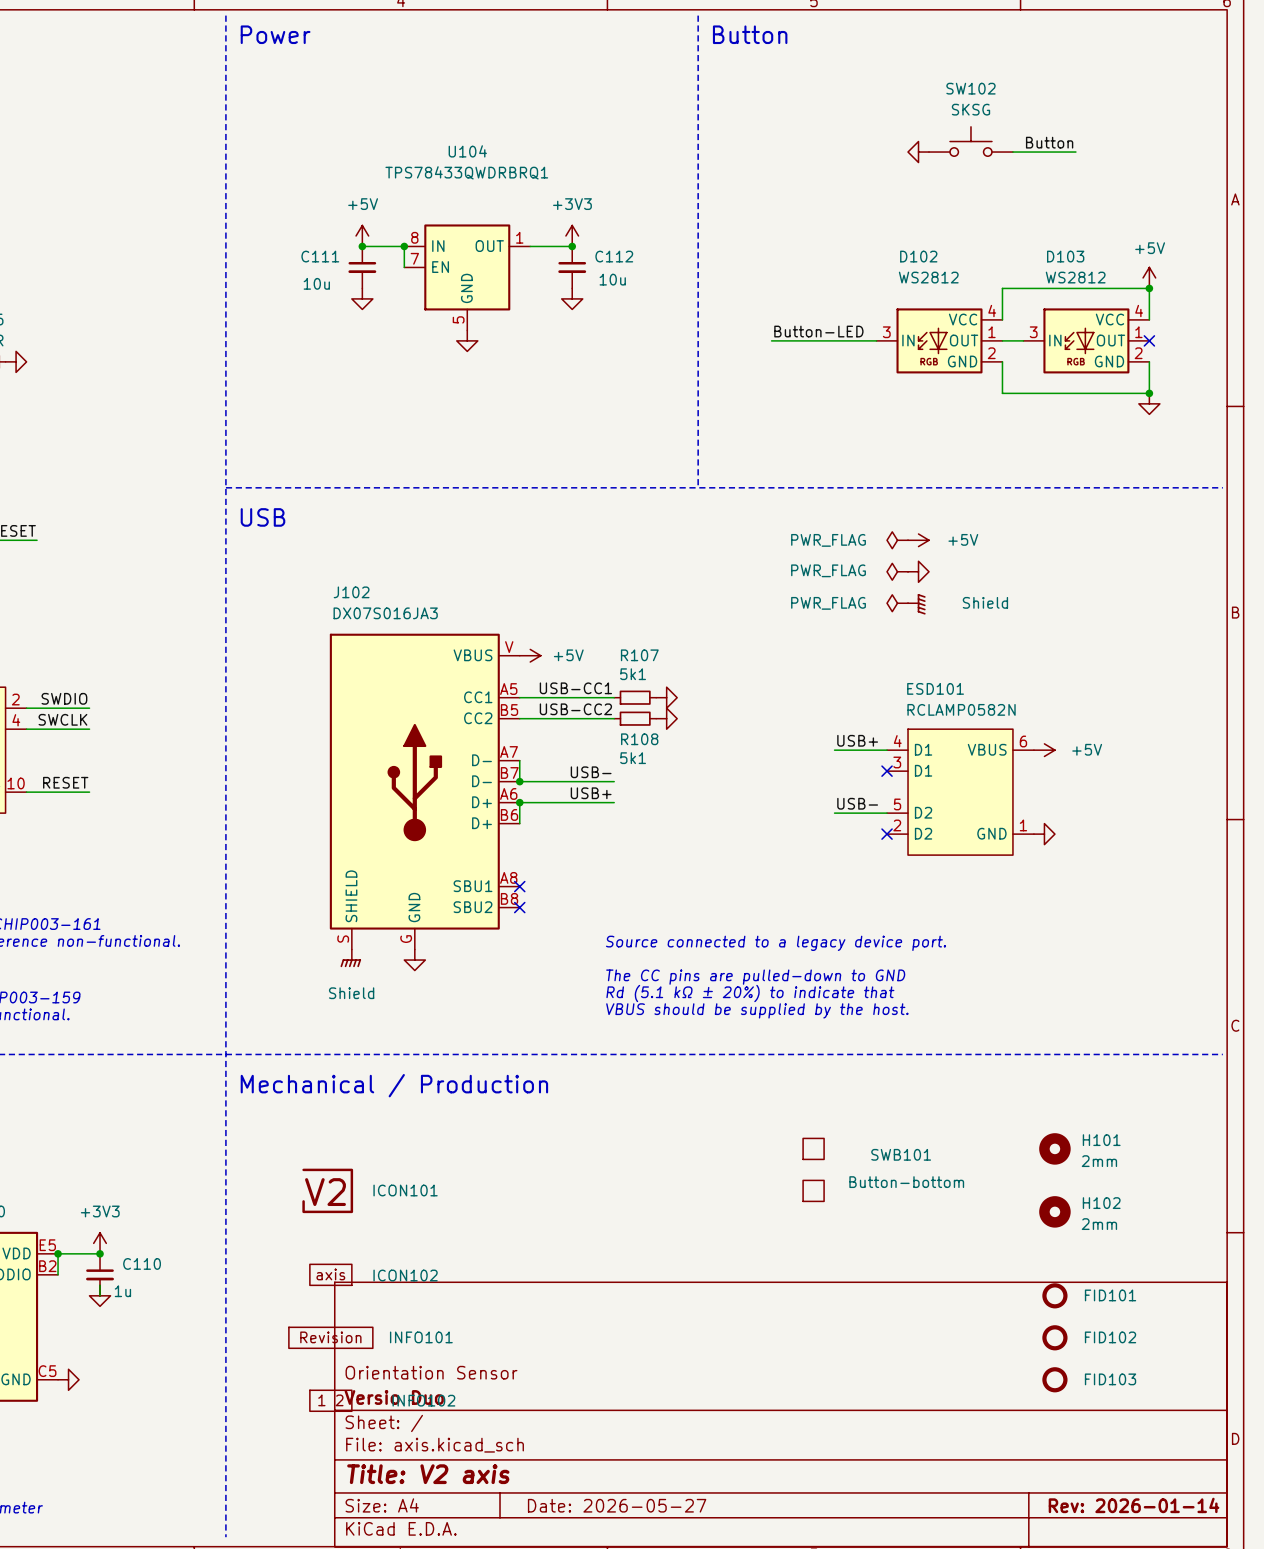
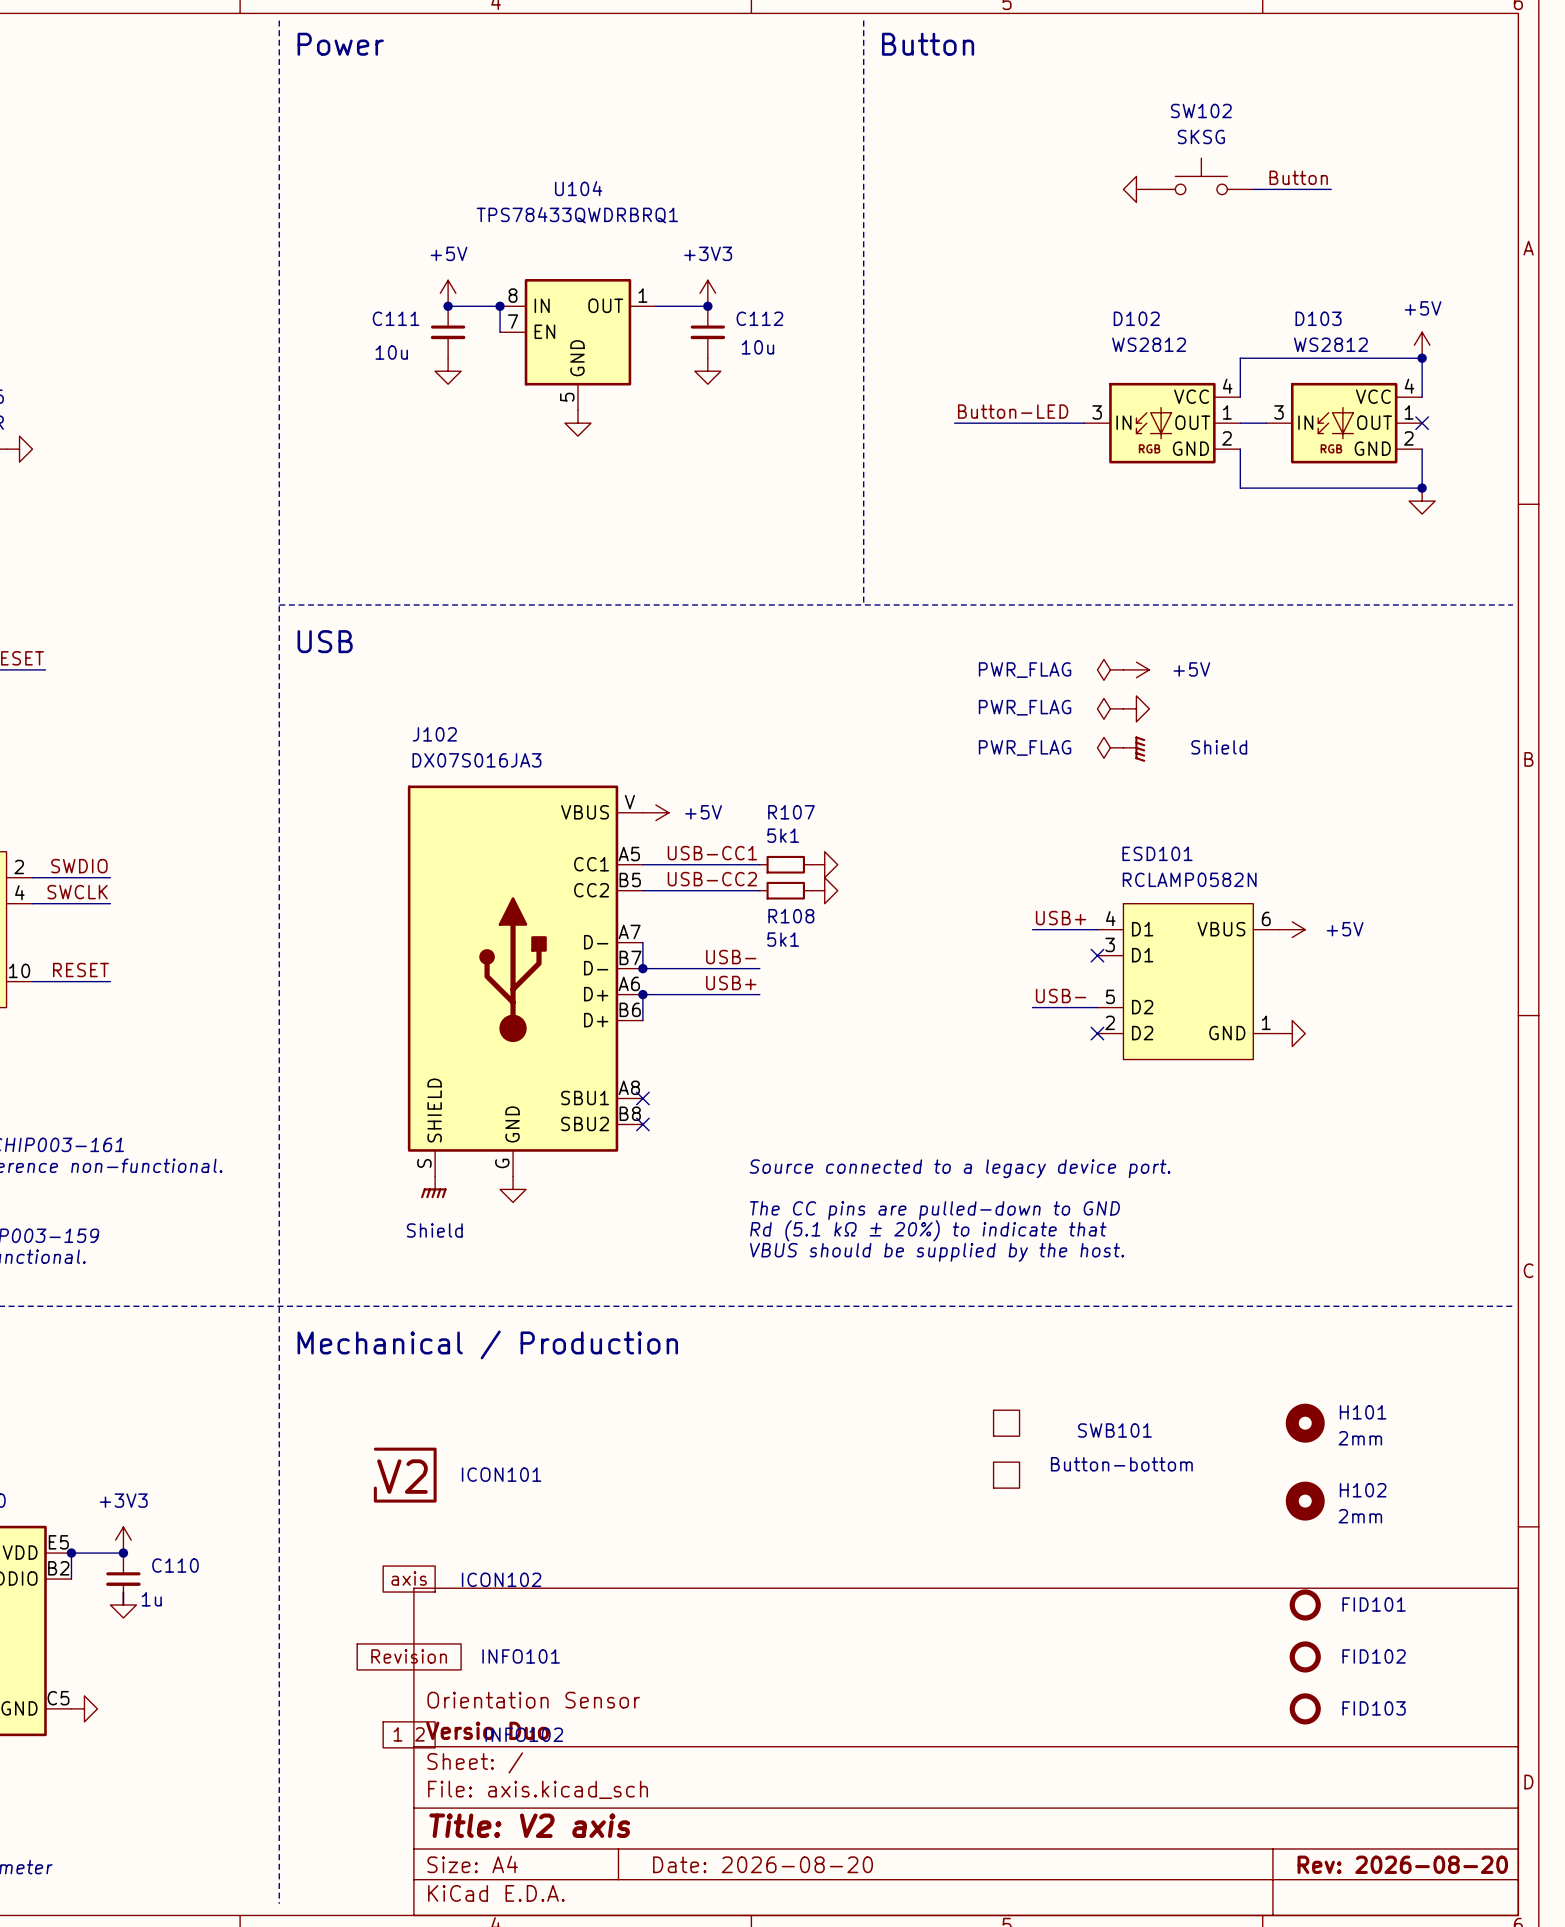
title block: Date: 2026-05-27 (617, 1505) -> Date: 2026-08-20 (763, 1864)
title block: Rev: 2026-01-14 (1134, 1505) -> Rev: 2026-08-20 (1402, 1864)

